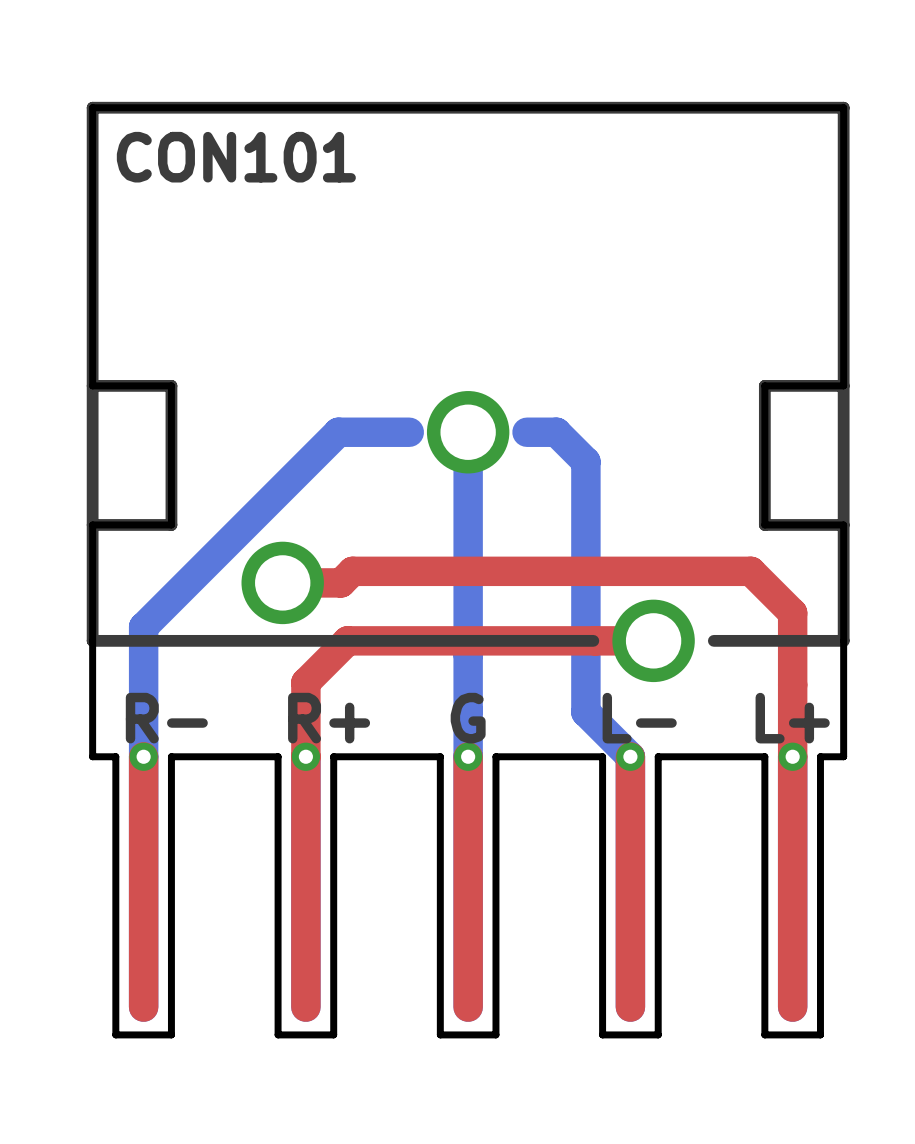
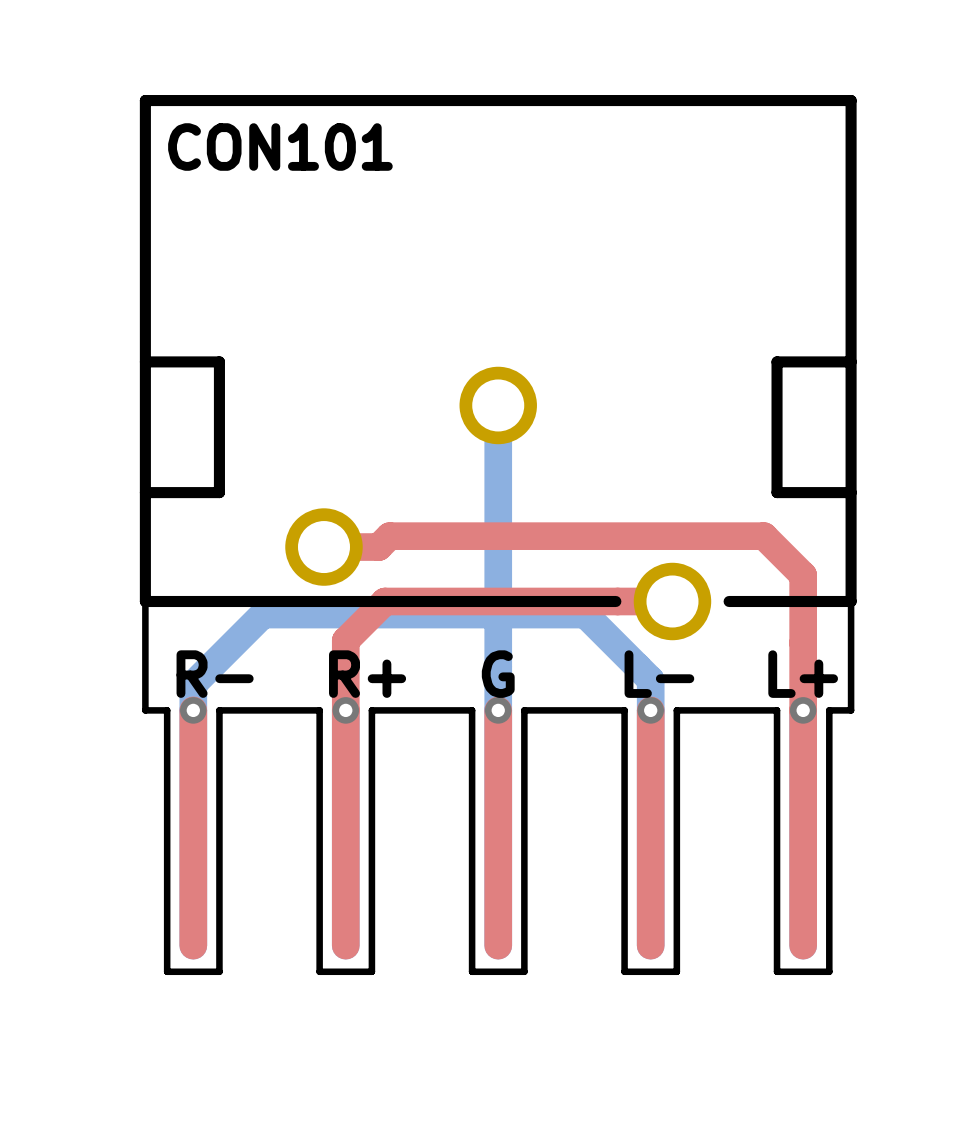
bottom track: (409, 432) (338, 432) (143, 627) (143, 728) -> (650, 710) (650, 679) (585, 614) (263, 614) (193, 684)
bottom track: (527, 432) (556, 432) (585, 461) (585, 712) (630, 756) -> none

